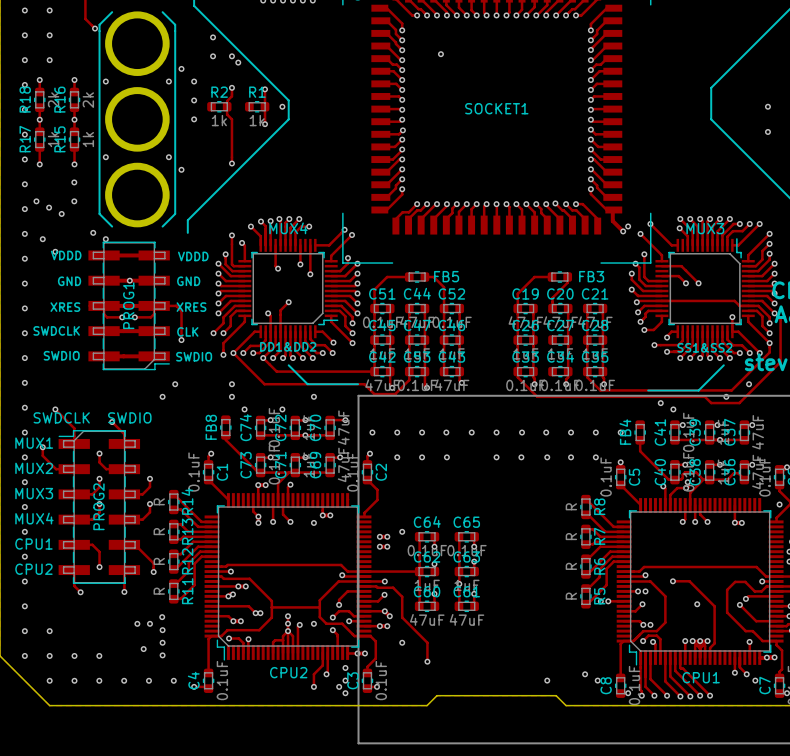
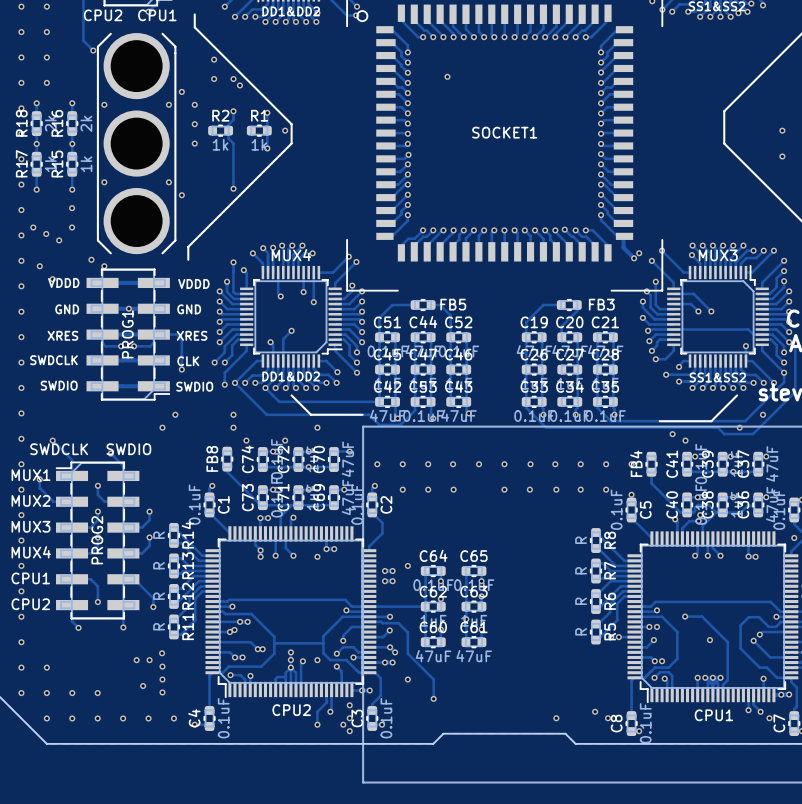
track: (640, 657) (641, 695) -> none
track: (645, 657) (645, 686) (654, 695) -> none
track: (650, 657) (650, 679) (667, 695) -> none
track: (665, 657) (665, 681) (680, 696) -> none
track: (670, 657) (670, 676) (690, 696) -> none
track: (675, 657) (675, 670) (700, 695) -> none
track: (680, 657) (680, 667) (710, 695) -> none
via: (641, 695) -> none
via: (654, 695) -> none
via: (667, 695) -> none
via: (700, 695) -> none
via: (710, 695) -> none
via: (680, 696) -> none
via: (690, 696) -> none

